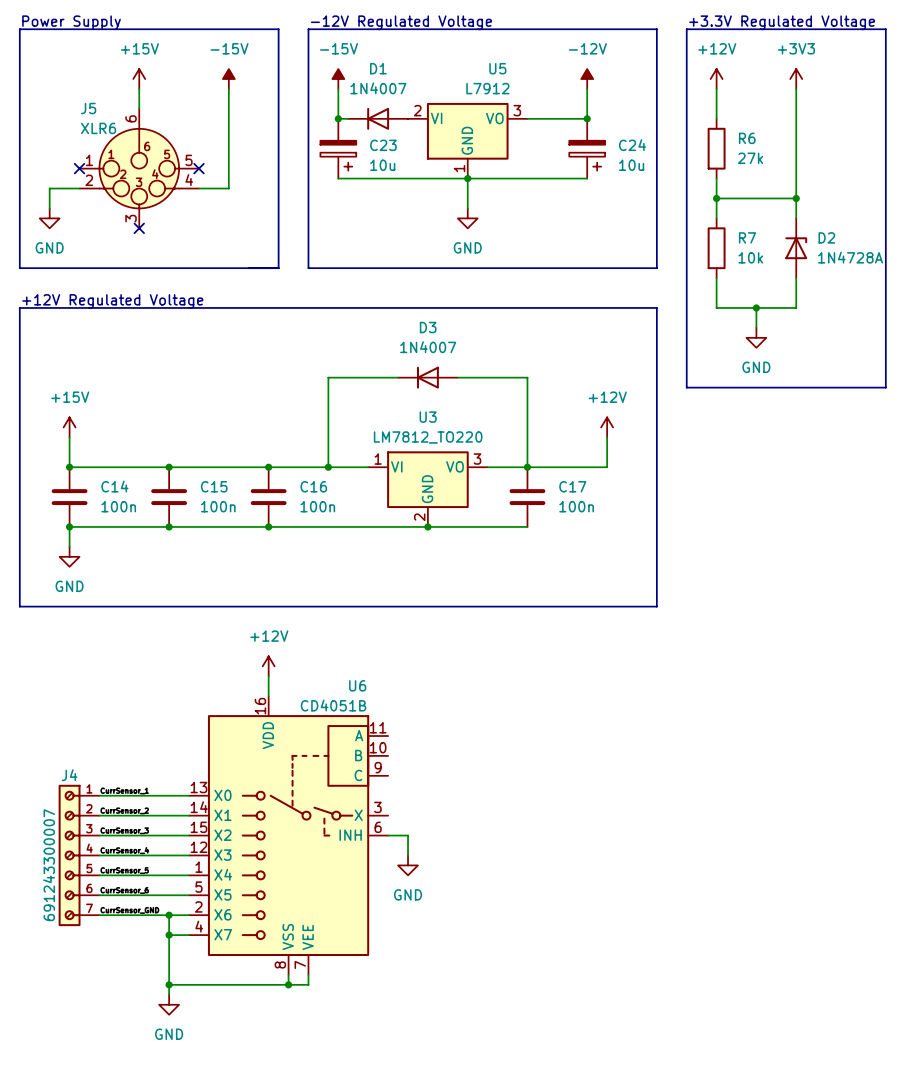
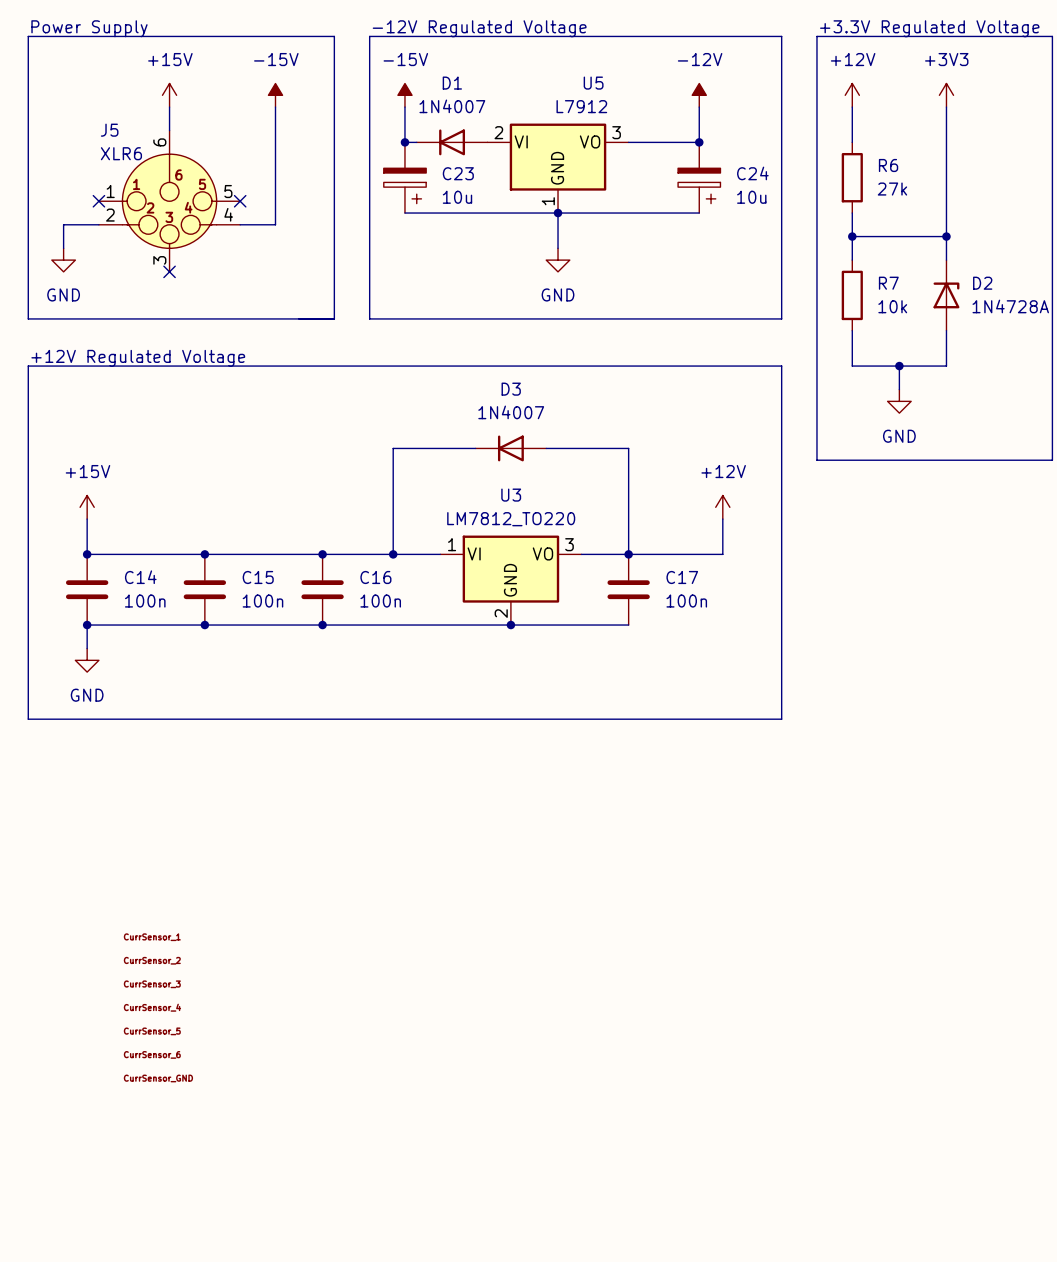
power symbol: +12V (268, 666) -> none
wire: (268, 676) (268, 696) -> none
wire: (99, 795) (189, 795) -> none
wire: (99, 815) (189, 815) -> none
wire: (99, 835) (189, 835) -> none
U6: CD4051B (288, 835) -> none
wire: (388, 835) (408, 835) (408, 855) -> none
J4: 691243300007 (79, 855) -> none
wire: (99, 855) (189, 855) -> none
power symbol: GND (408, 865) -> none
wire: (99, 875) (189, 875) -> none
wire: (99, 895) (189, 895) -> none
wire: (99, 915) (189, 915) -> none
wire: (169, 915) (169, 994) -> none
junction: (169, 915) -> none
wire: (169, 935) (189, 935) -> none
junction: (169, 935) -> none
wire: (288, 974) (288, 984) -> none
wire: (308, 974) (308, 984) (169, 984) -> none
junction: (169, 984) -> none
junction: (288, 984) -> none
power symbol: GND (169, 1004) -> none

